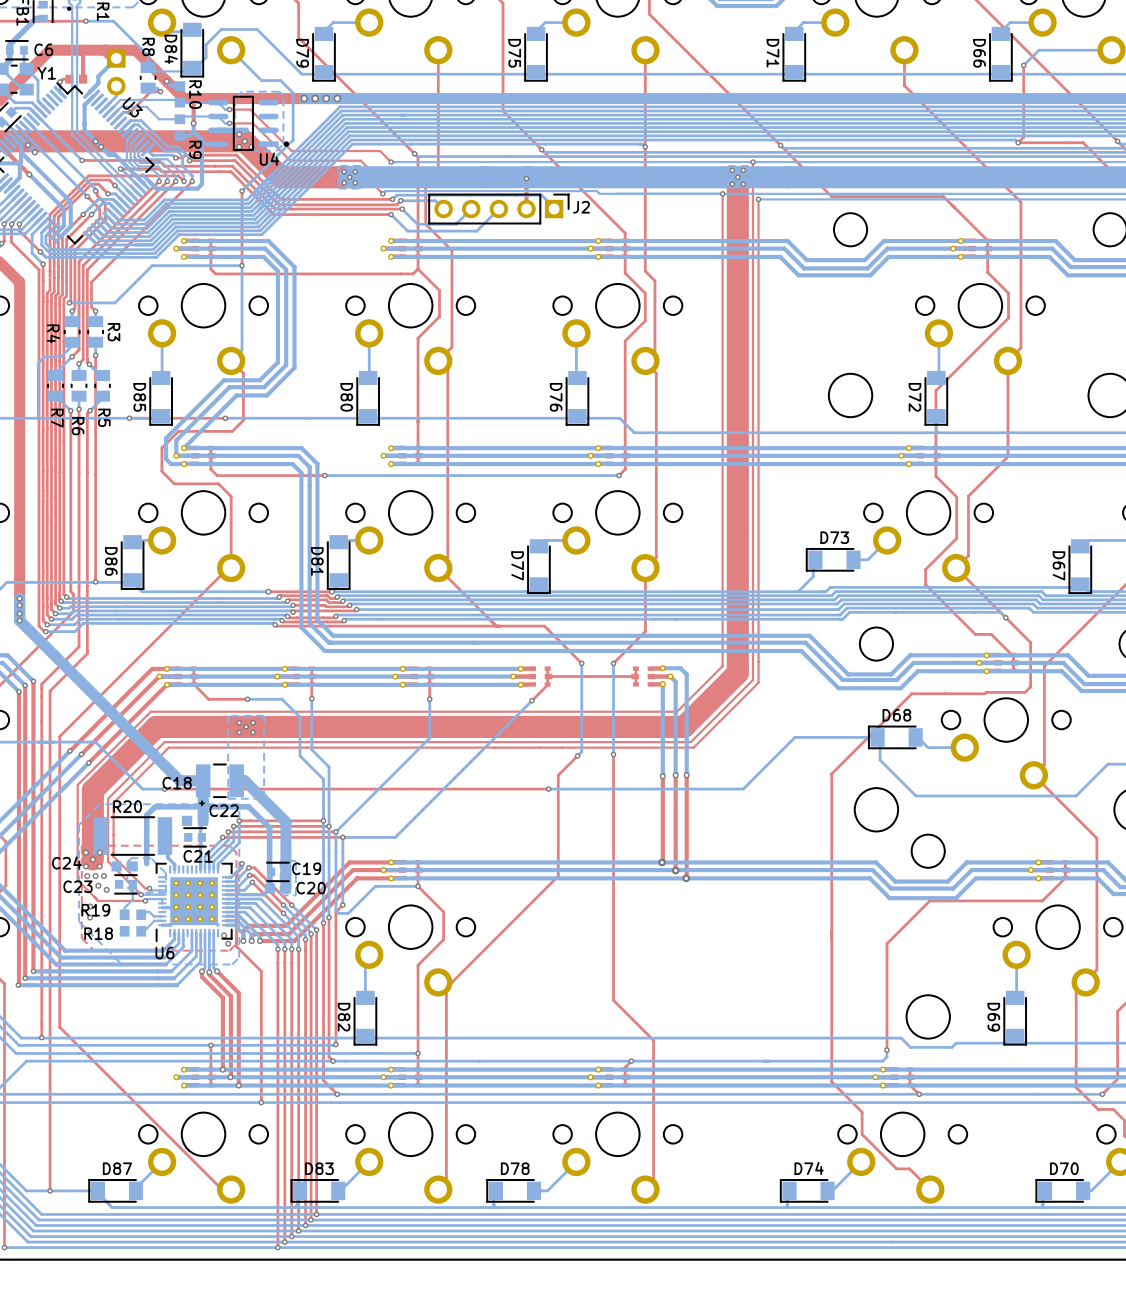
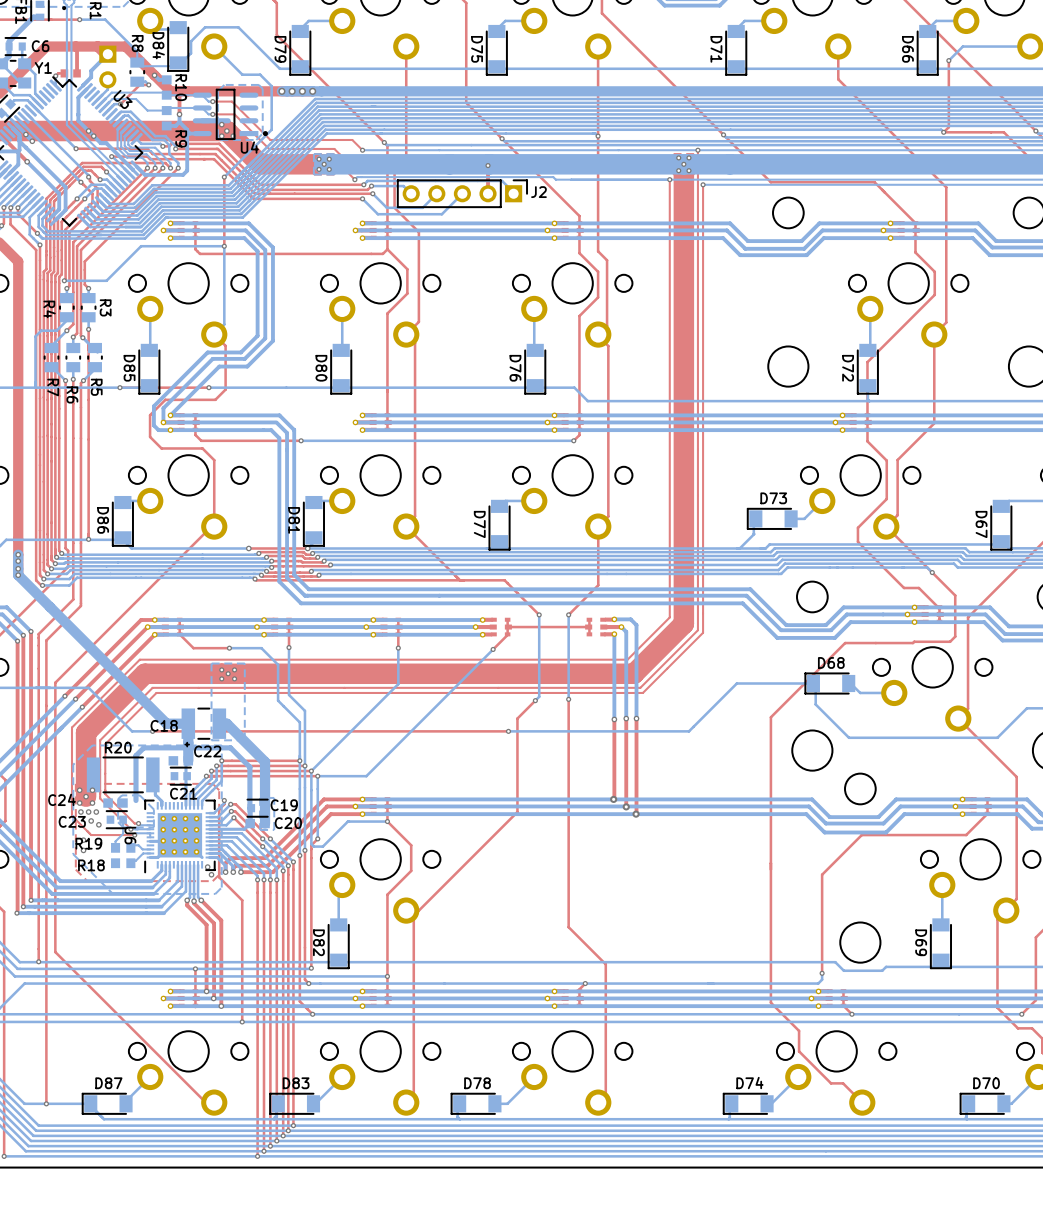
U6 name rotation: 0° (164, 953) -> 90° clockwise (130, 835)
U6 name position: U6 (164, 953) -> U6 (130, 835)

